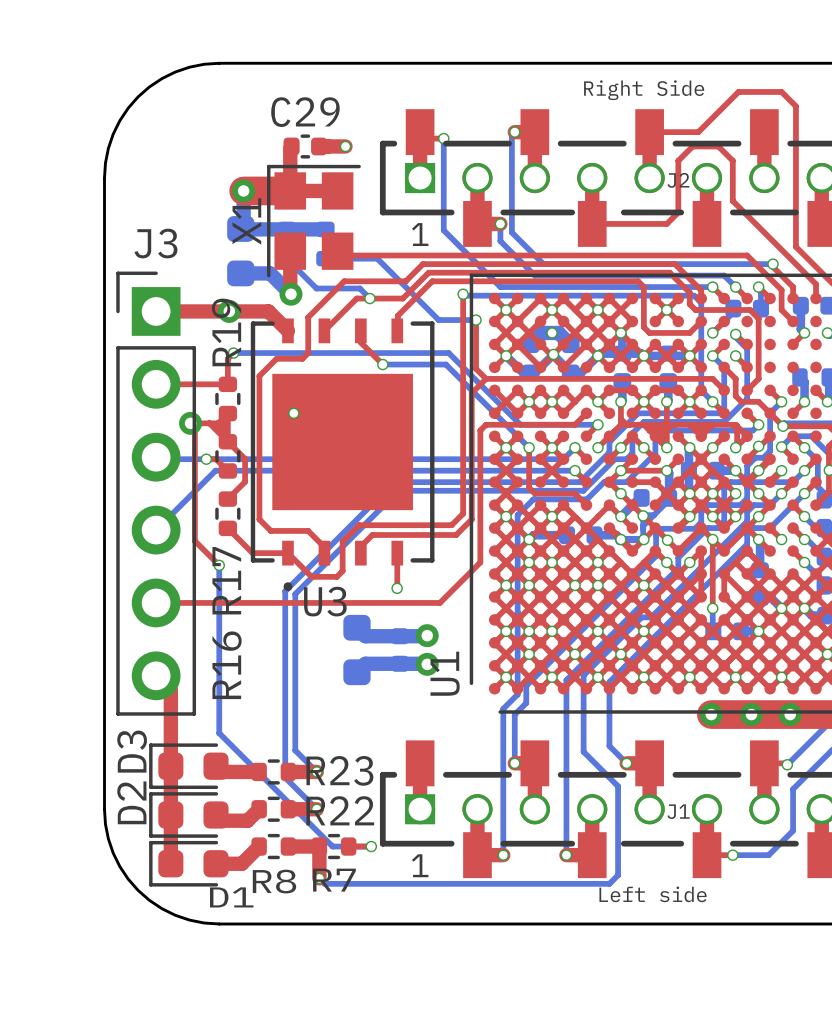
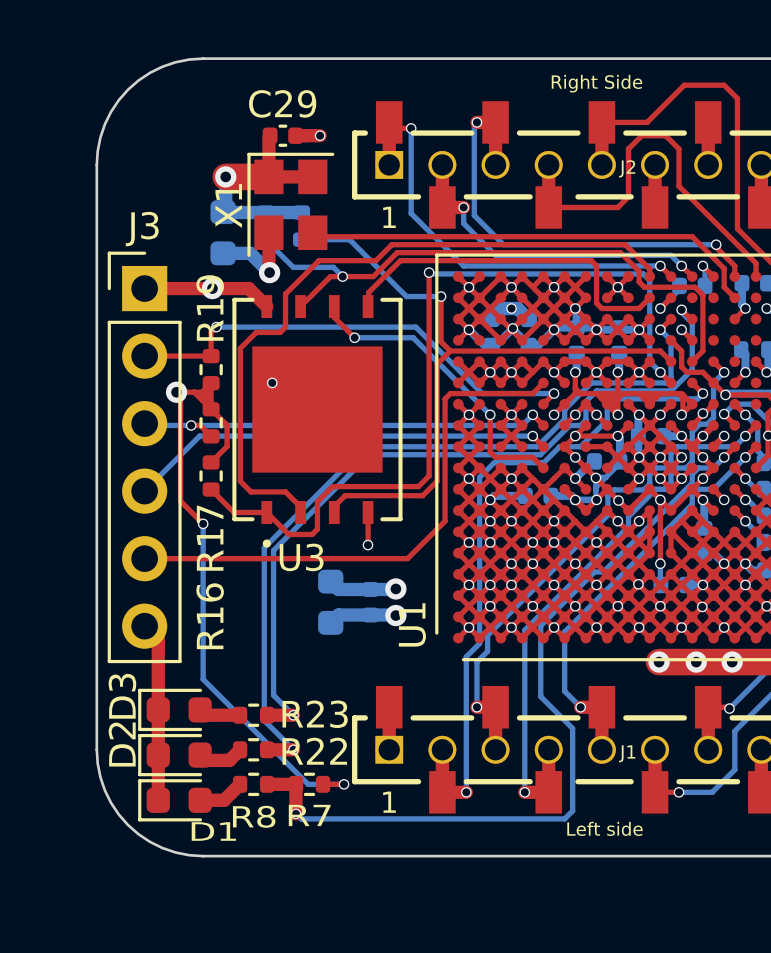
via: none -> (511, 563)
via: none -> (532, 563)
via: none -> (575, 563)
via: none -> (638, 584)
via: none -> (745, 584)
via: none -> (617, 606)
via: none -> (660, 606)
via: none -> (702, 606)

